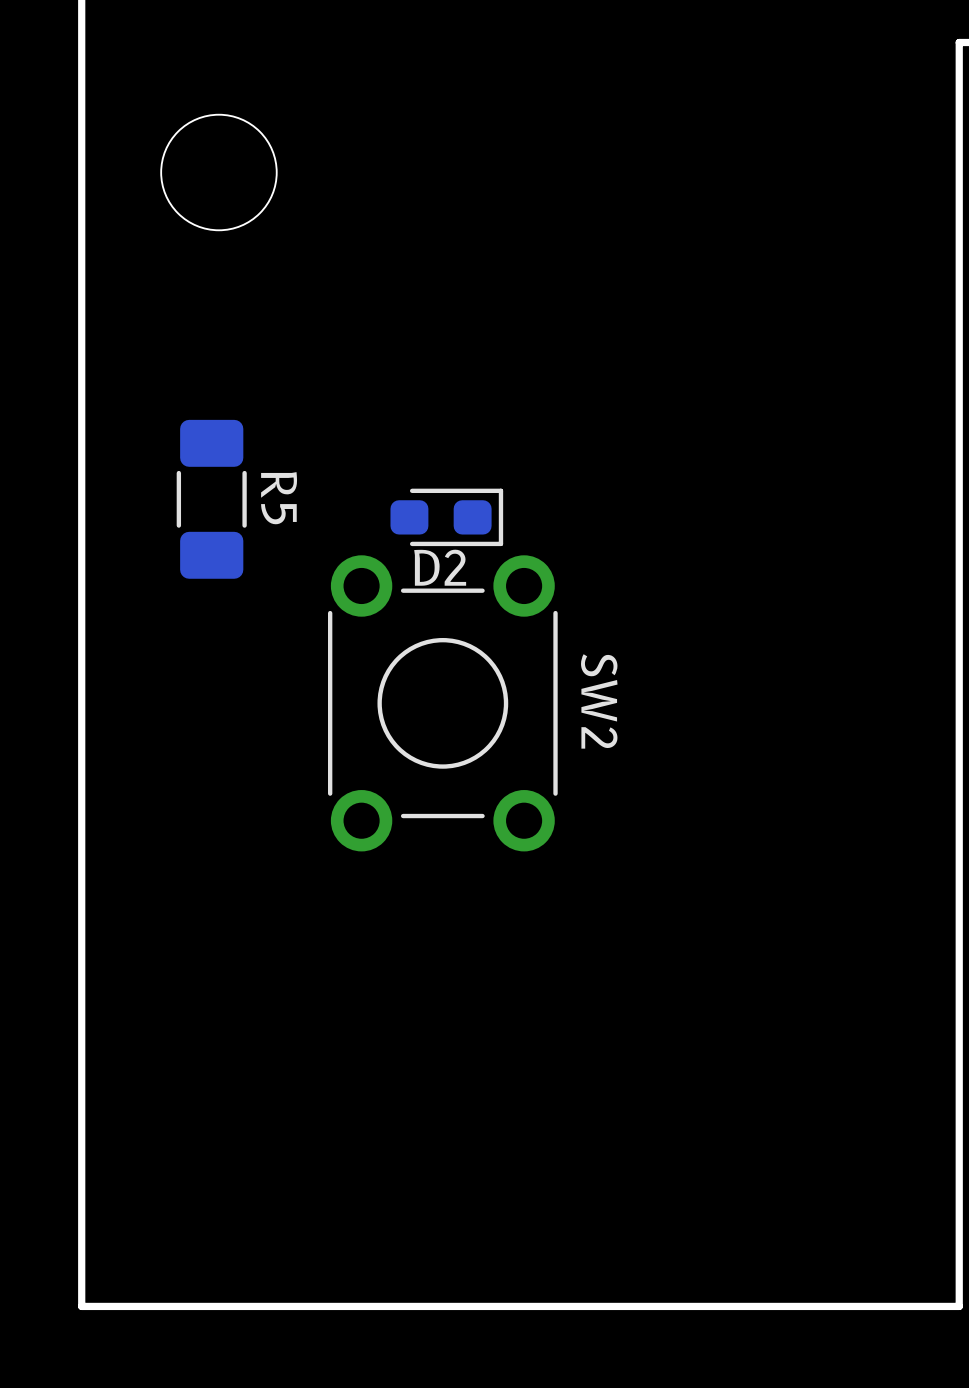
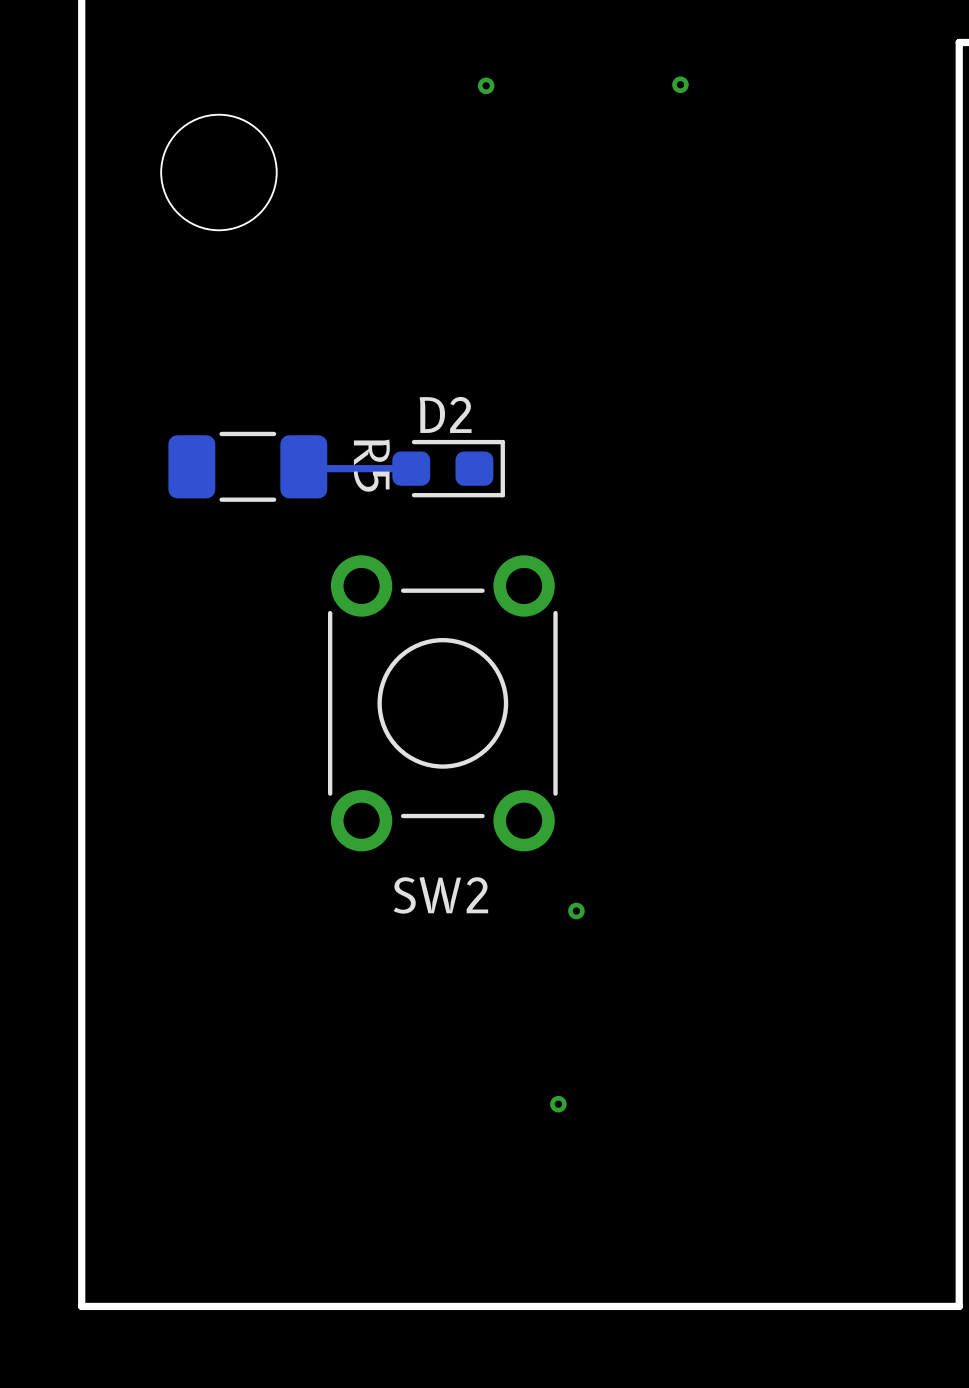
via: none -> (680, 84)
via: none -> (486, 85)
track: none -> (303, 466) (305, 468) (411, 468)
R5 rotation: 0° (211, 499) -> 90° clockwise (247, 466)
D2 position: (446, 517) -> (448, 468)
D2 name position: D2 (440, 567) -> D2 (445, 414)
SW2 name rotation: 0° (599, 701) -> 90° counterclockwise (440, 895)
SW2 name position: SW2 (599, 701) -> SW2 (440, 895)
via: none -> (576, 911)
via: none -> (558, 1104)

